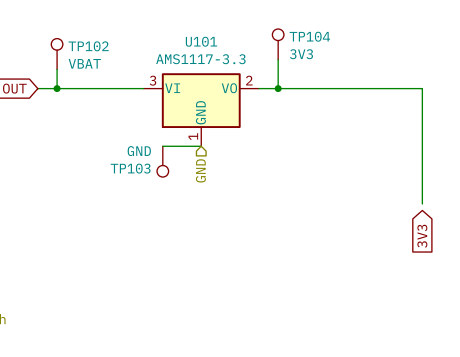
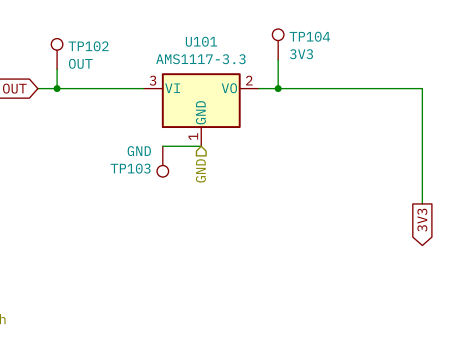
TP102 value: VBAT (84, 63) -> OUT (80, 63)
global label rotation: 0° (422, 236) -> 180° (422, 220)

